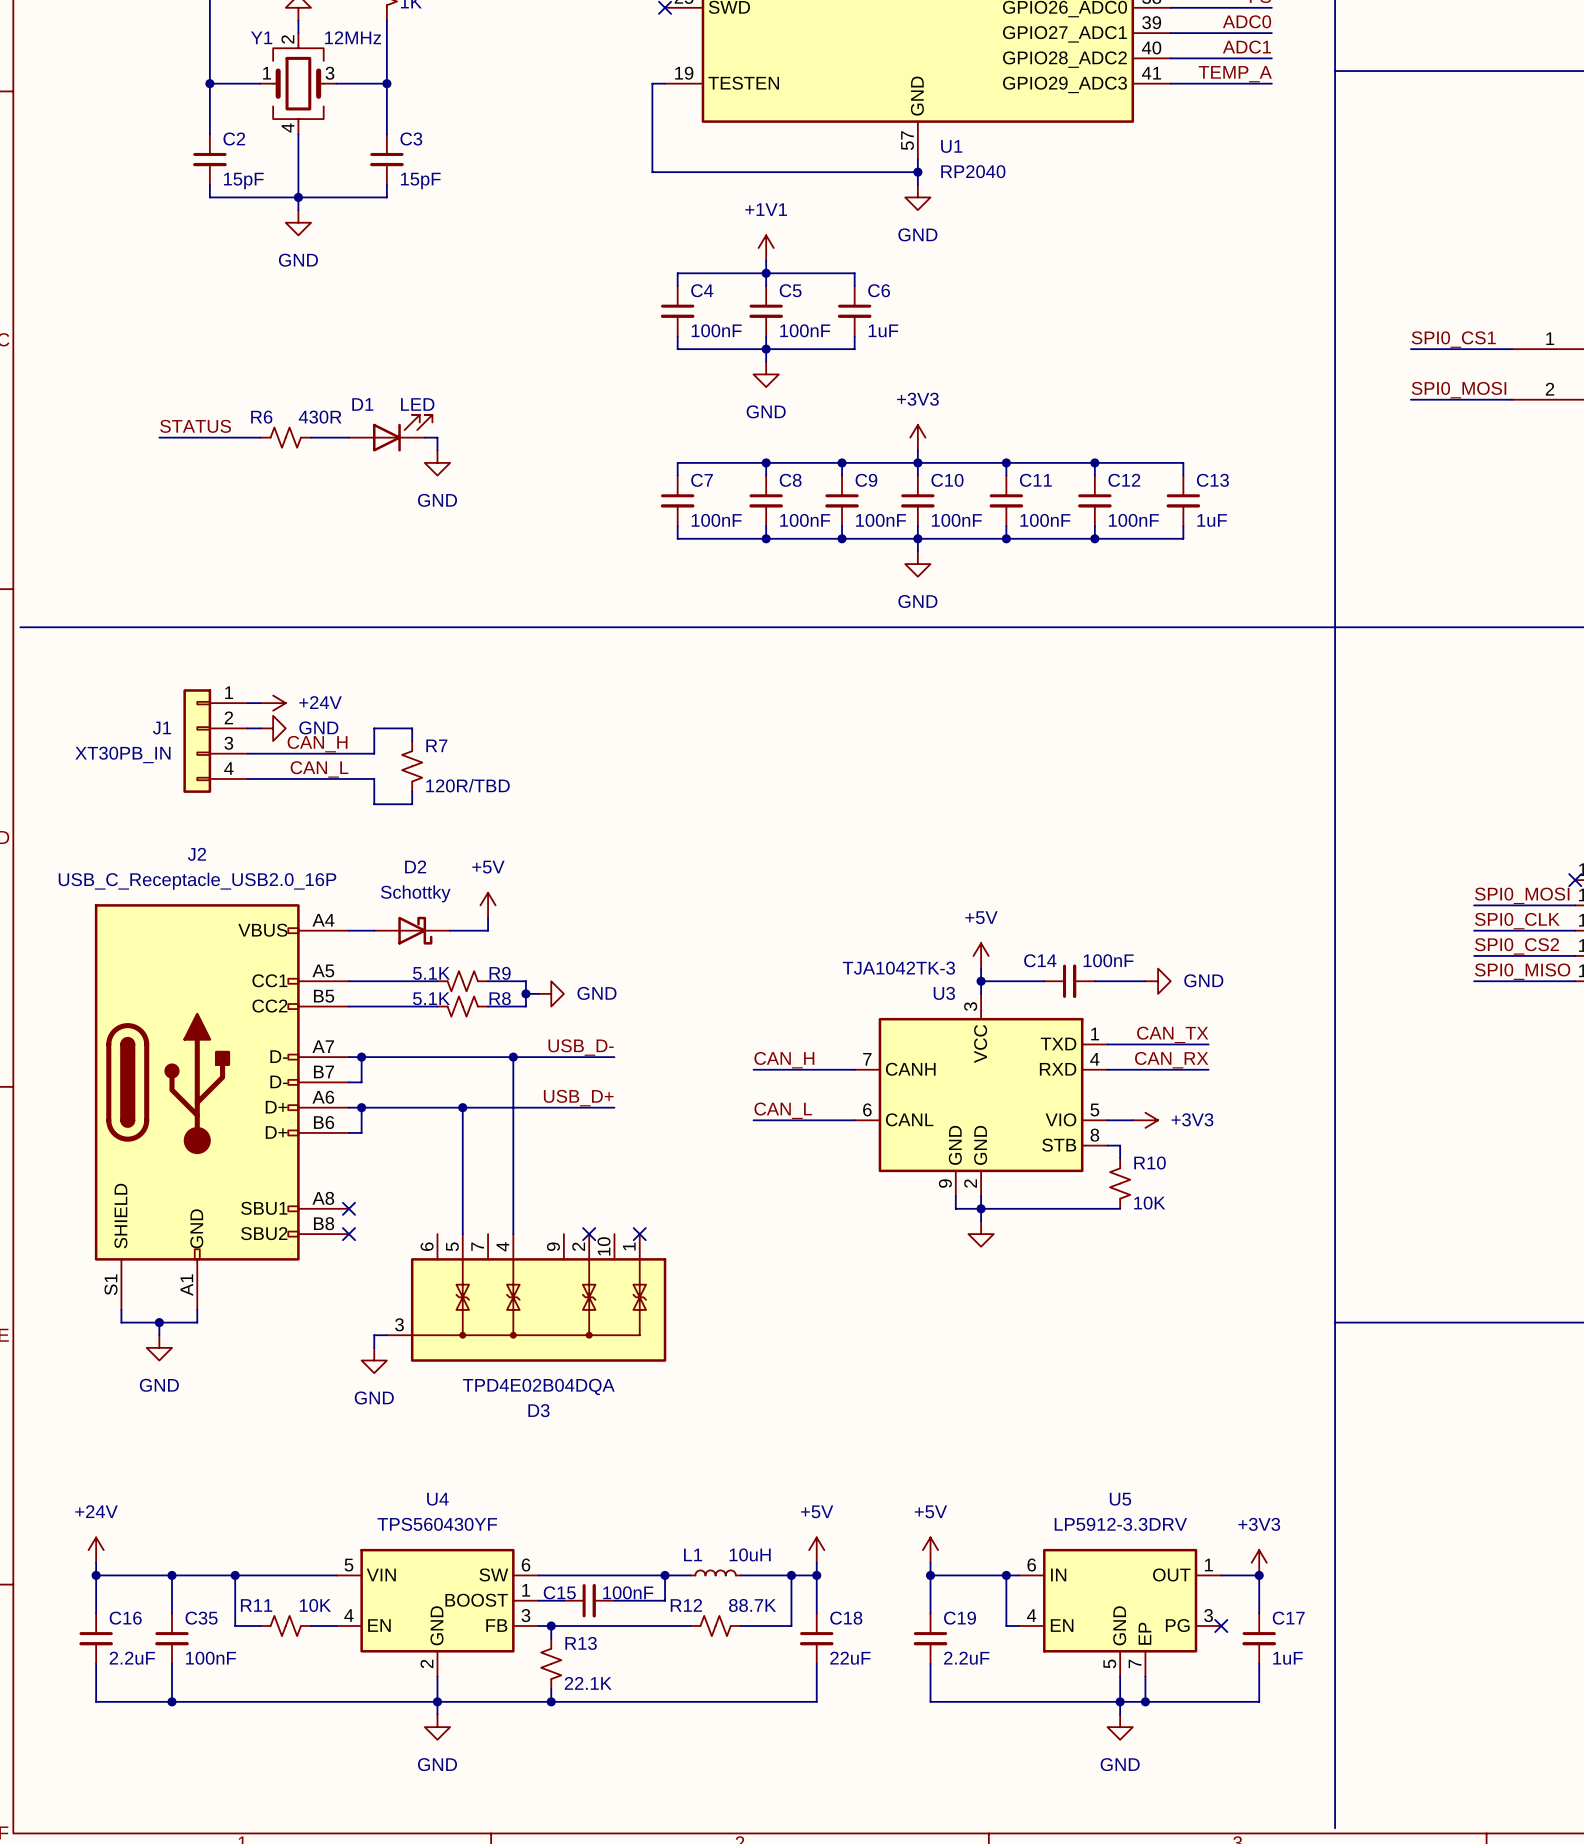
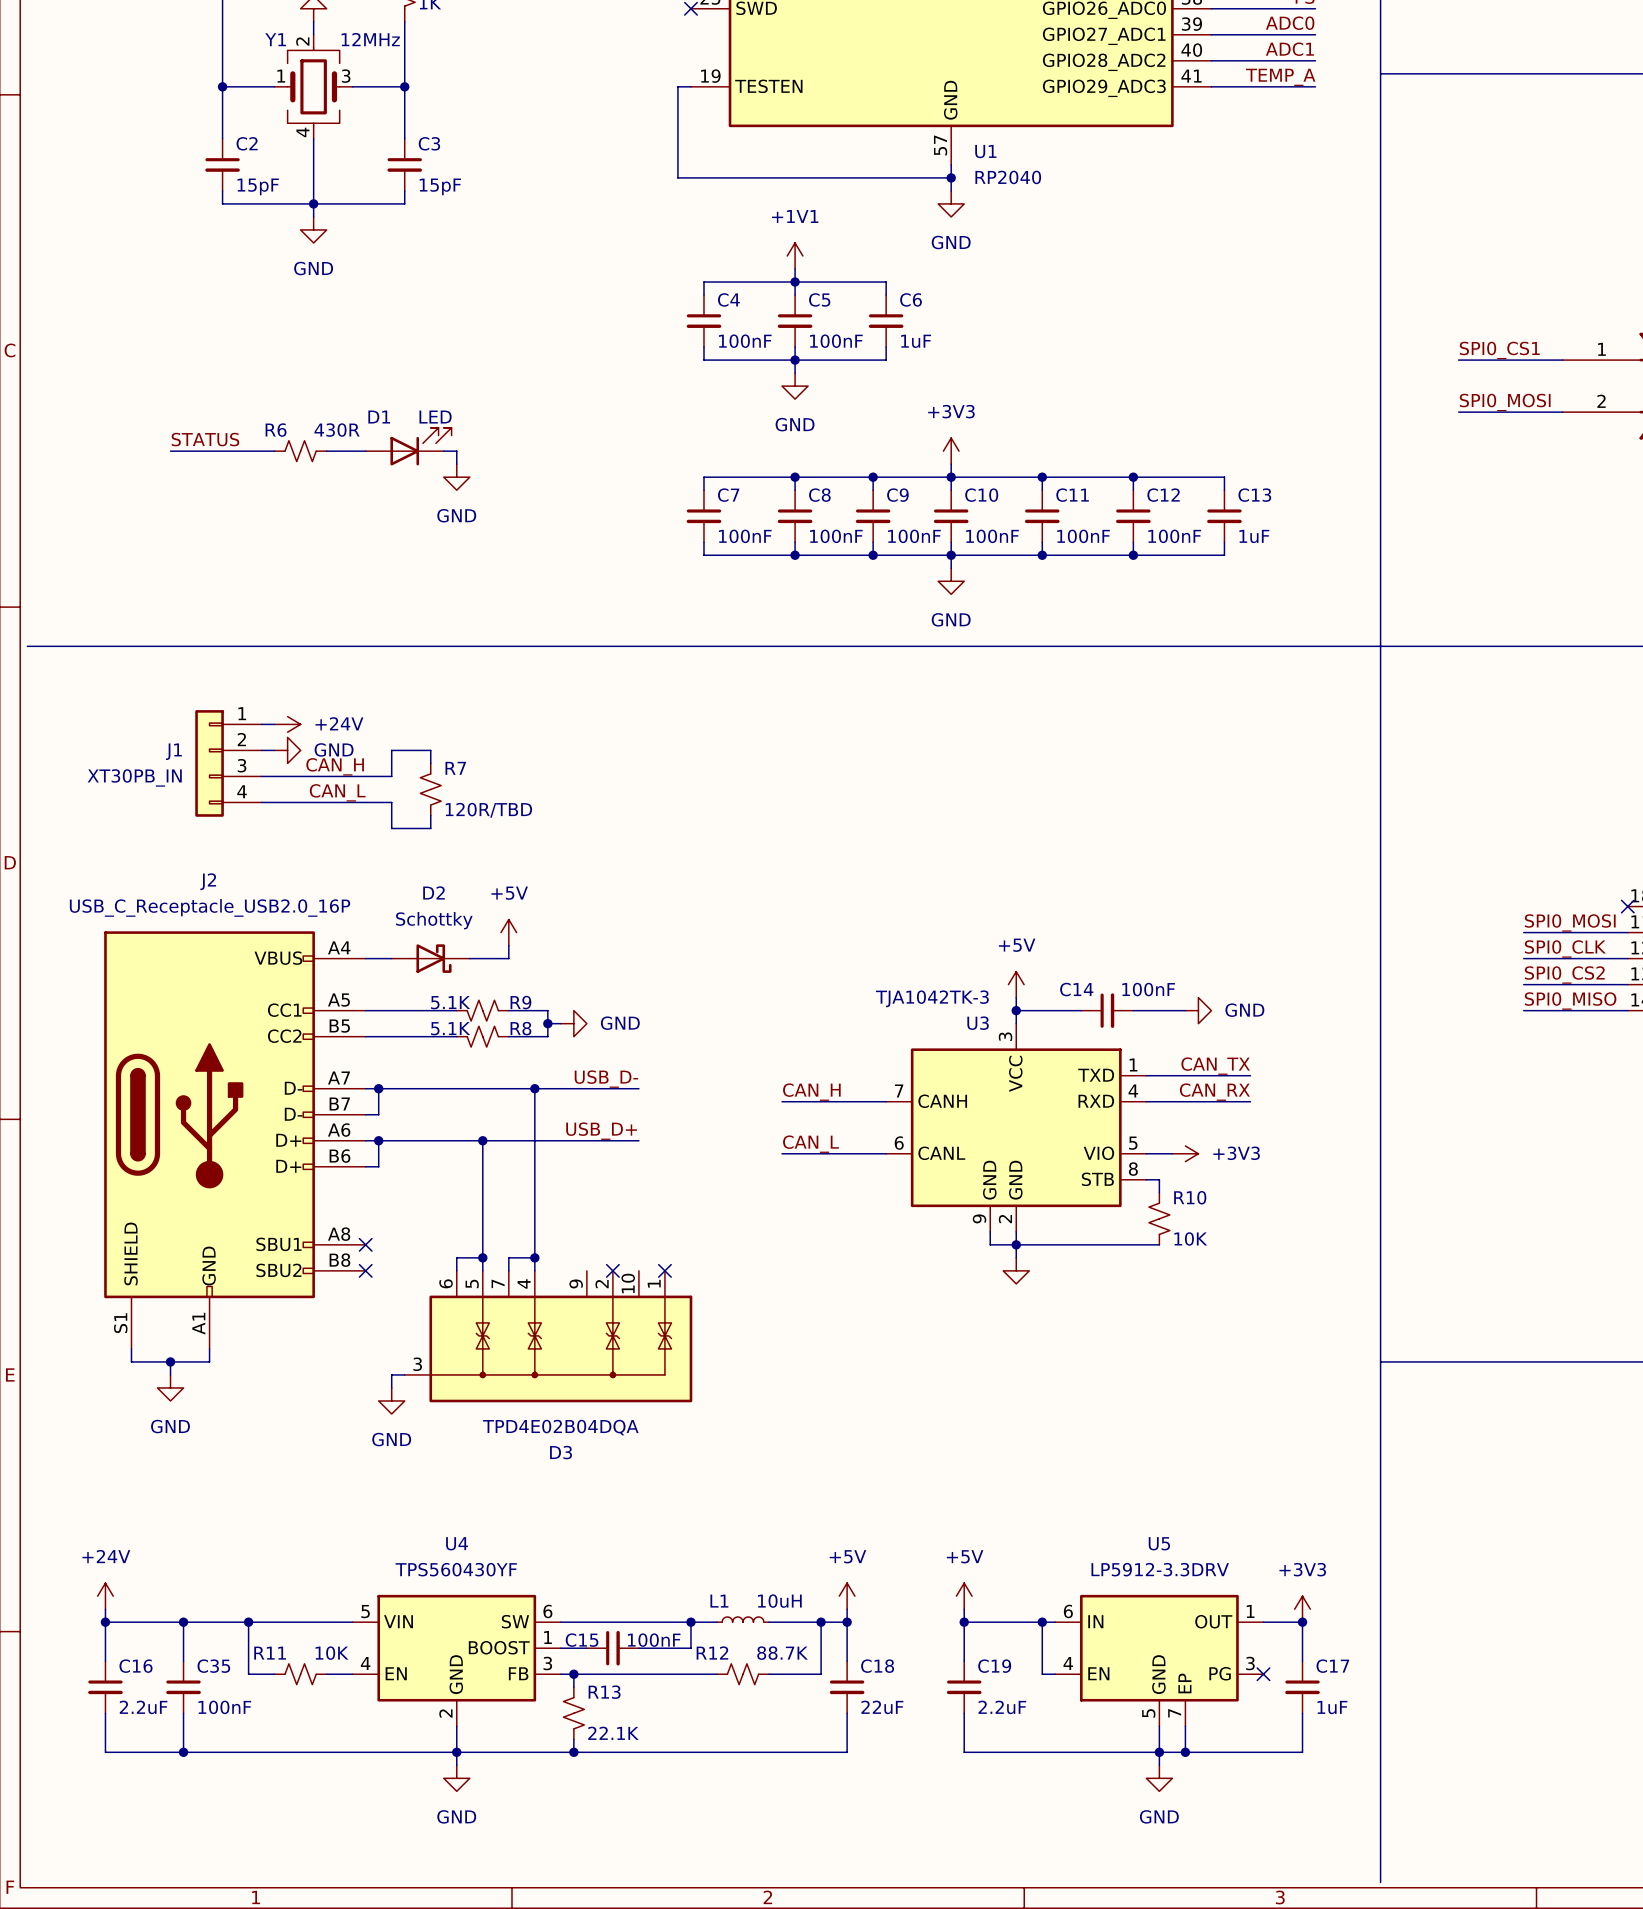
wire: none -> (482, 1257) (456, 1257) (456, 1270)
junction: none -> (482, 1257)
wire: none -> (534, 1257) (508, 1257) (508, 1270)
junction: none -> (534, 1257)

